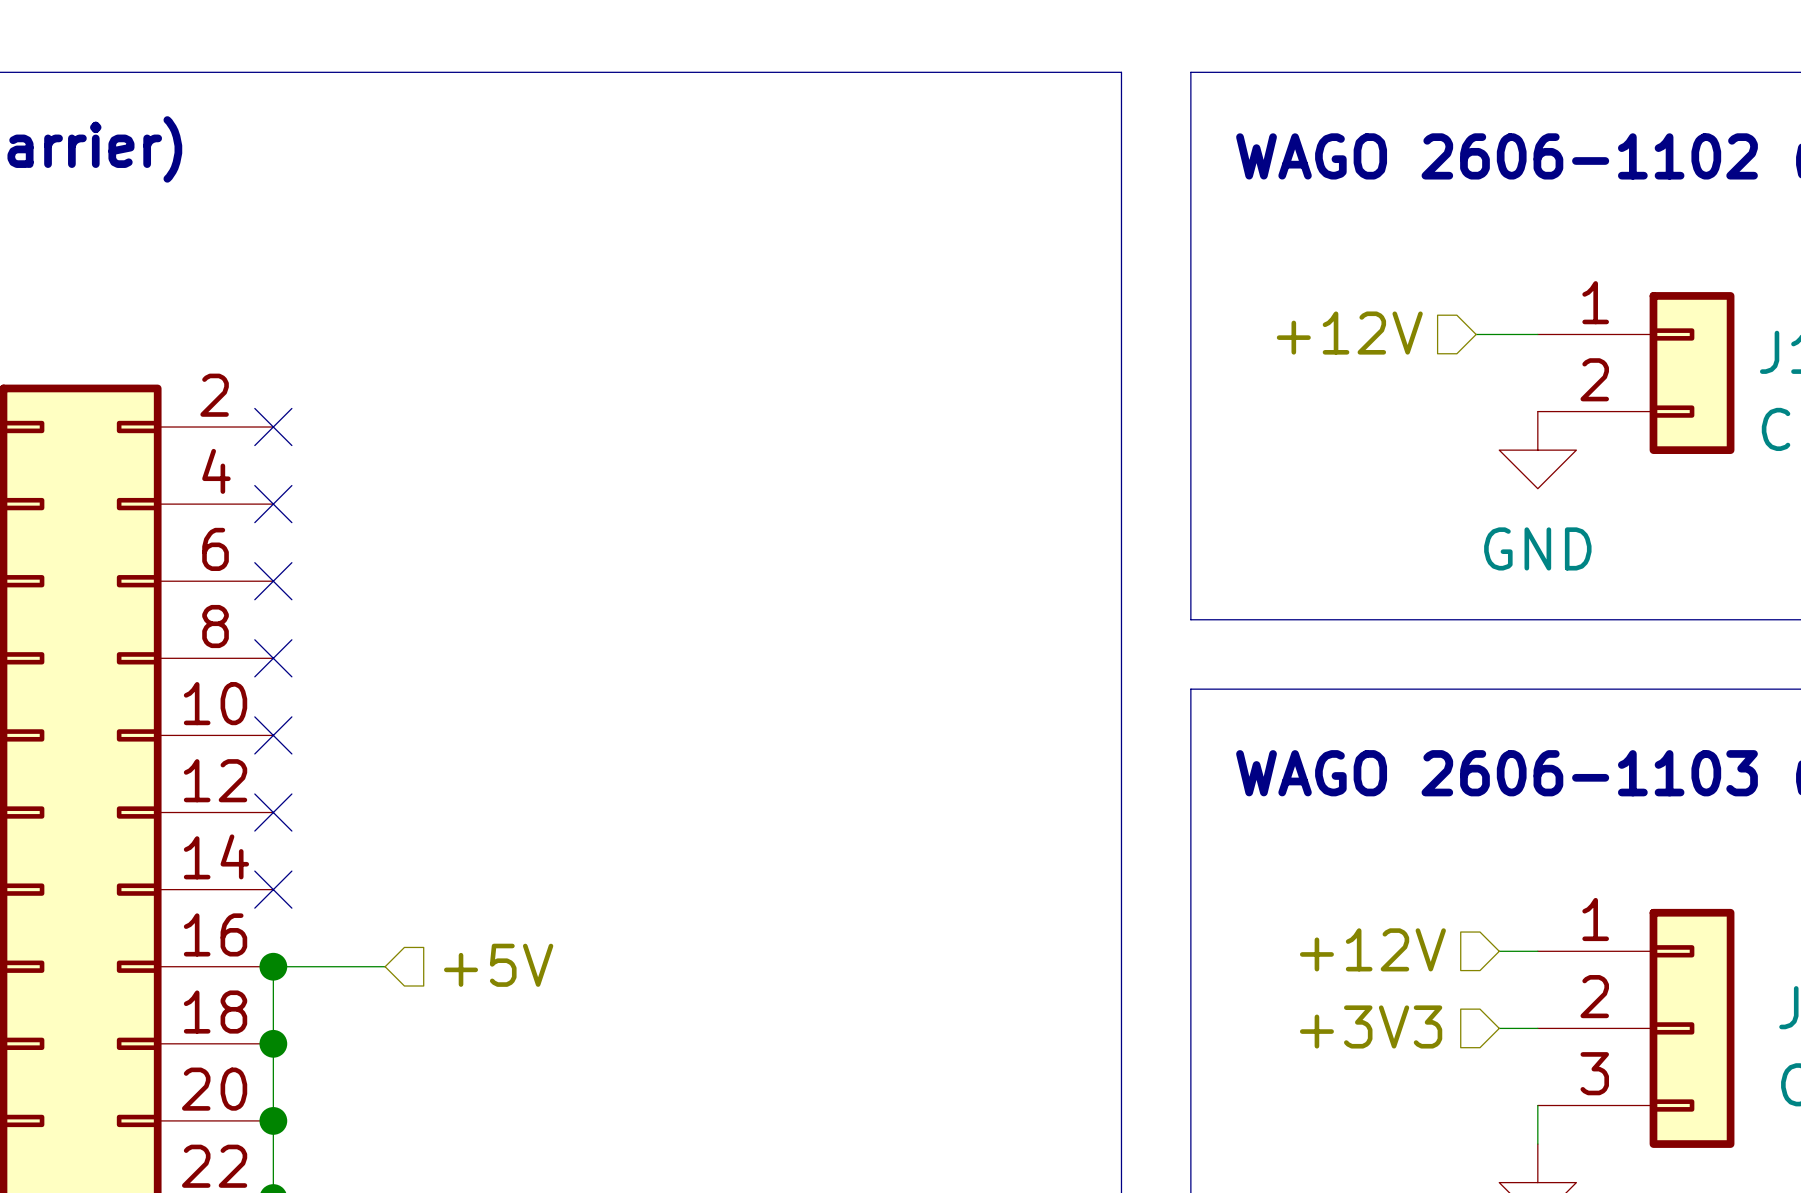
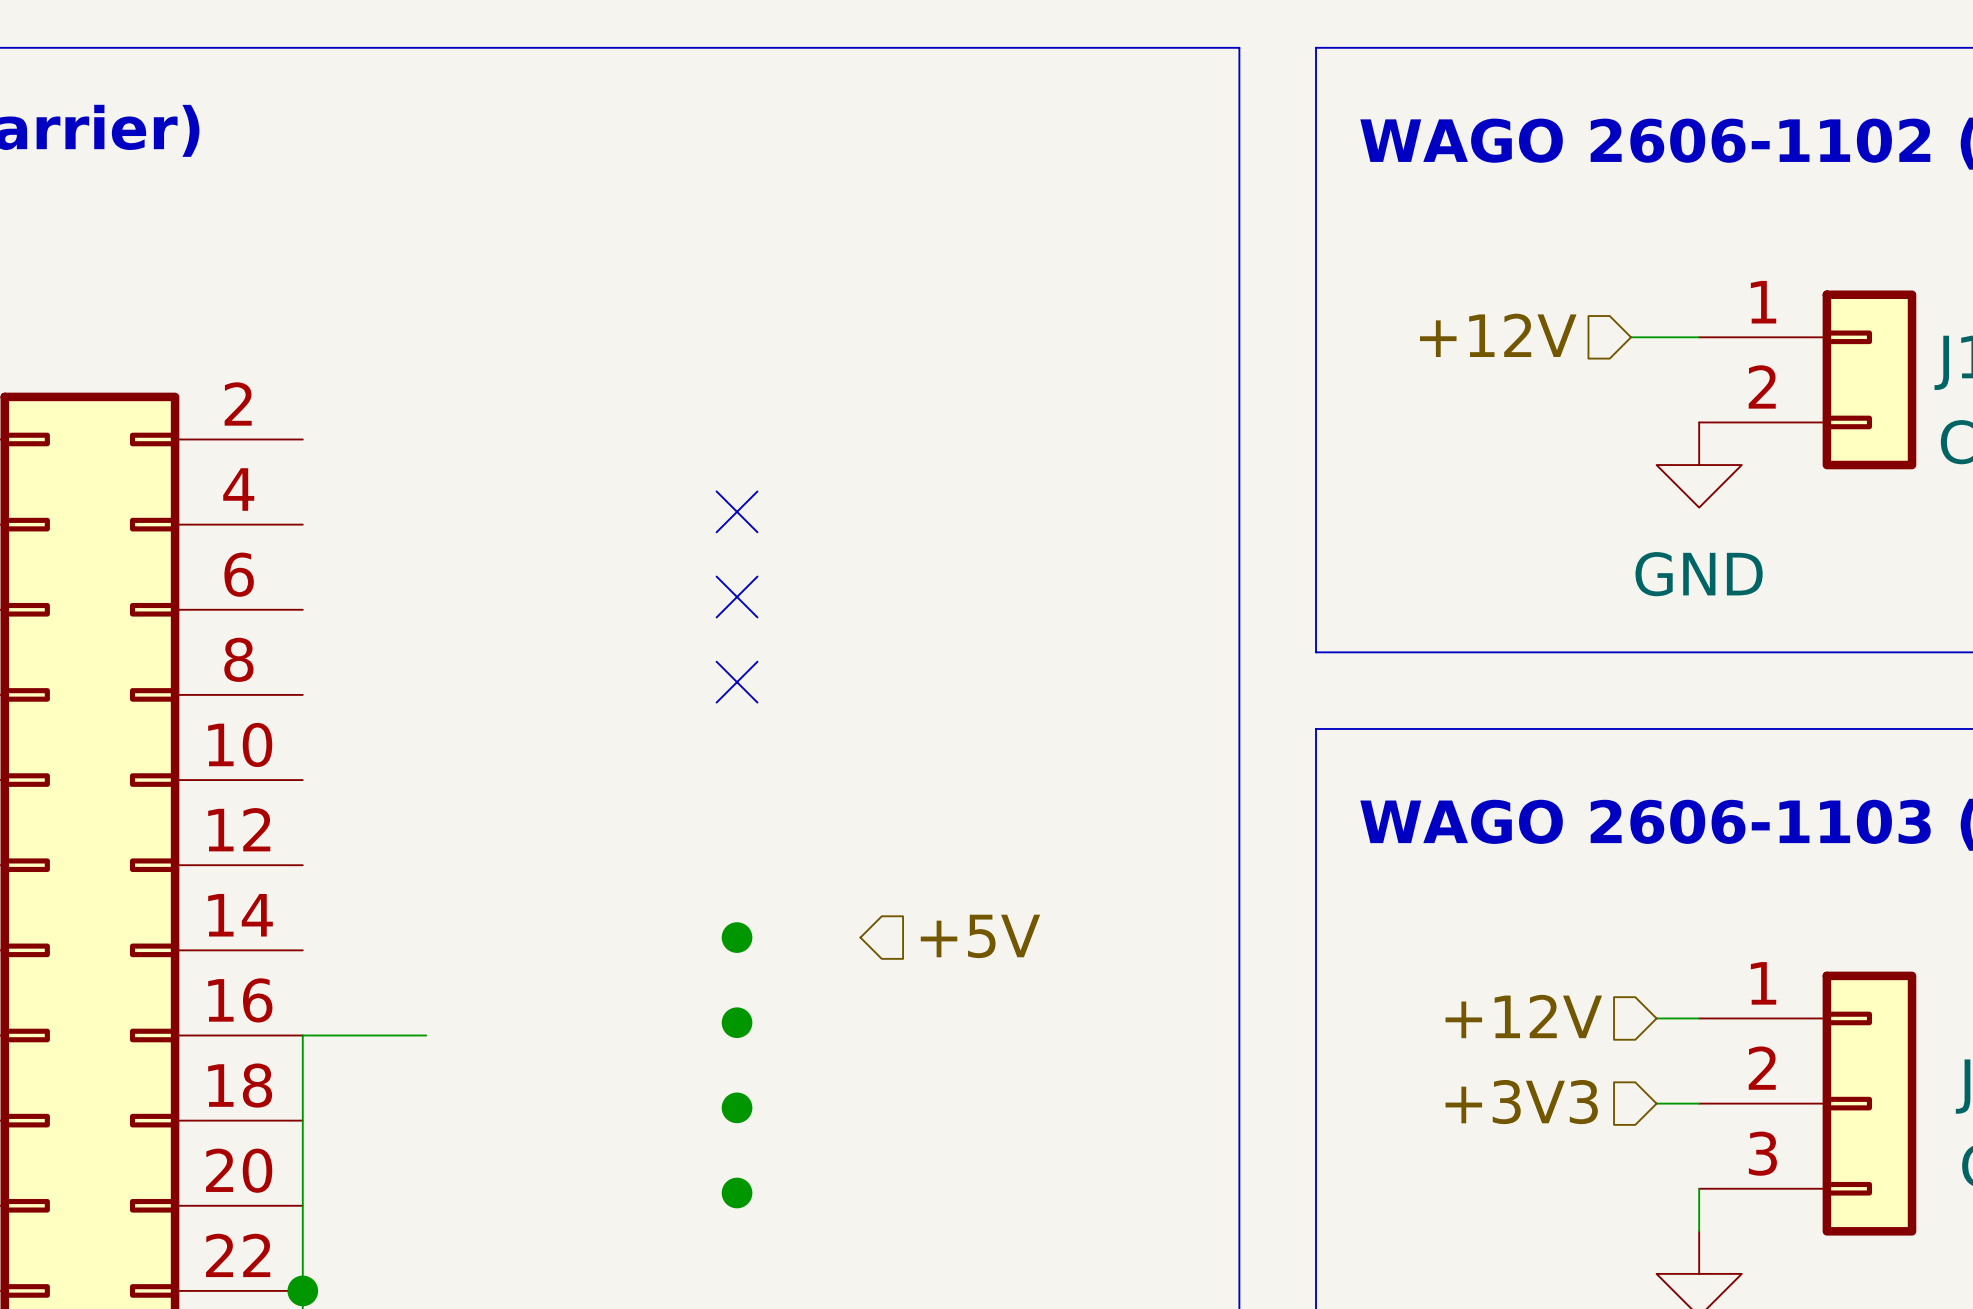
no-connect mark: (273, 427) -> none
no-connect mark: none -> (737, 511)
no-connect mark: (273, 504) -> none
no-connect mark: none -> (737, 597)
no-connect mark: (273, 581) -> none
no-connect mark: none -> (737, 682)
no-connect mark: (273, 658) -> none
no-connect mark: (273, 735) -> none
no-connect mark: (273, 812) -> none
junction: none -> (737, 937)
no-connect mark: (273, 889) -> none
junction: none -> (737, 1022)
hierarchical label position: +5V (498, 965) -> +5V (980, 936)
junction: (273, 966) -> none
junction: none -> (737, 1107)
junction: (273, 1043) -> none
junction: none -> (737, 1193)
junction: (273, 1120) -> none

